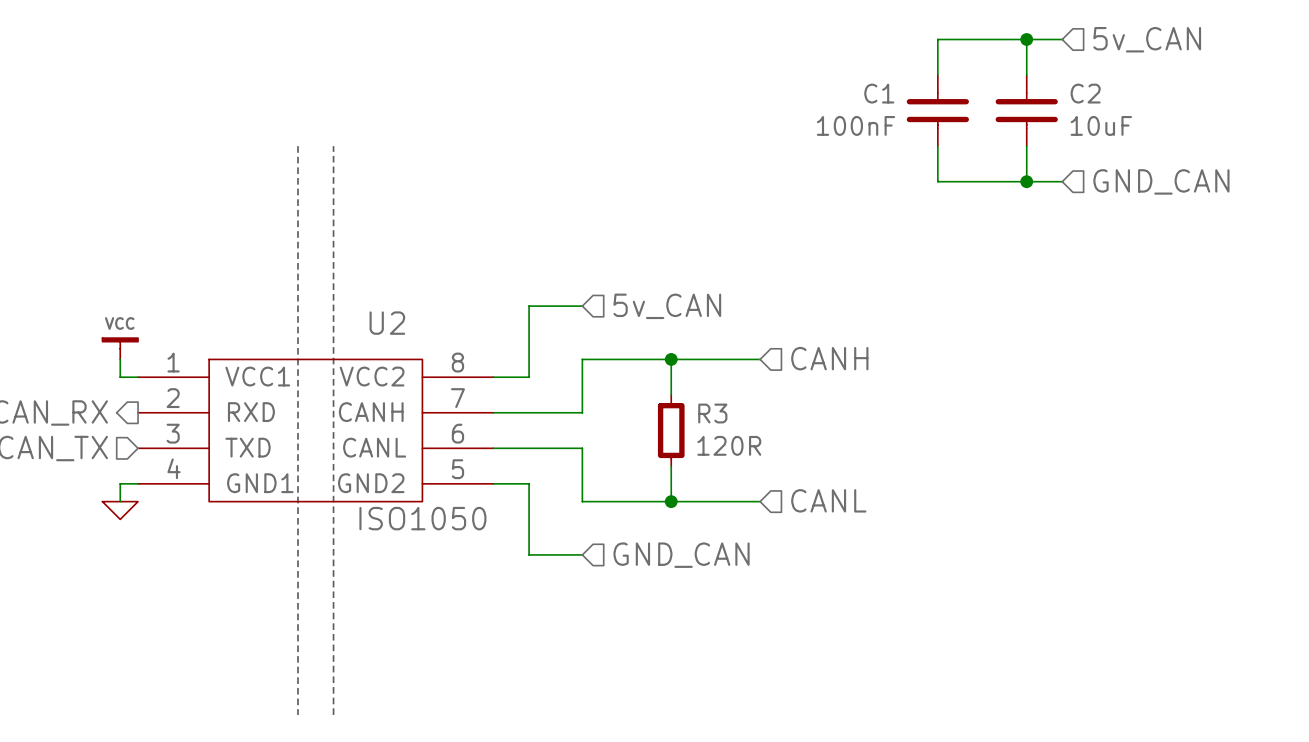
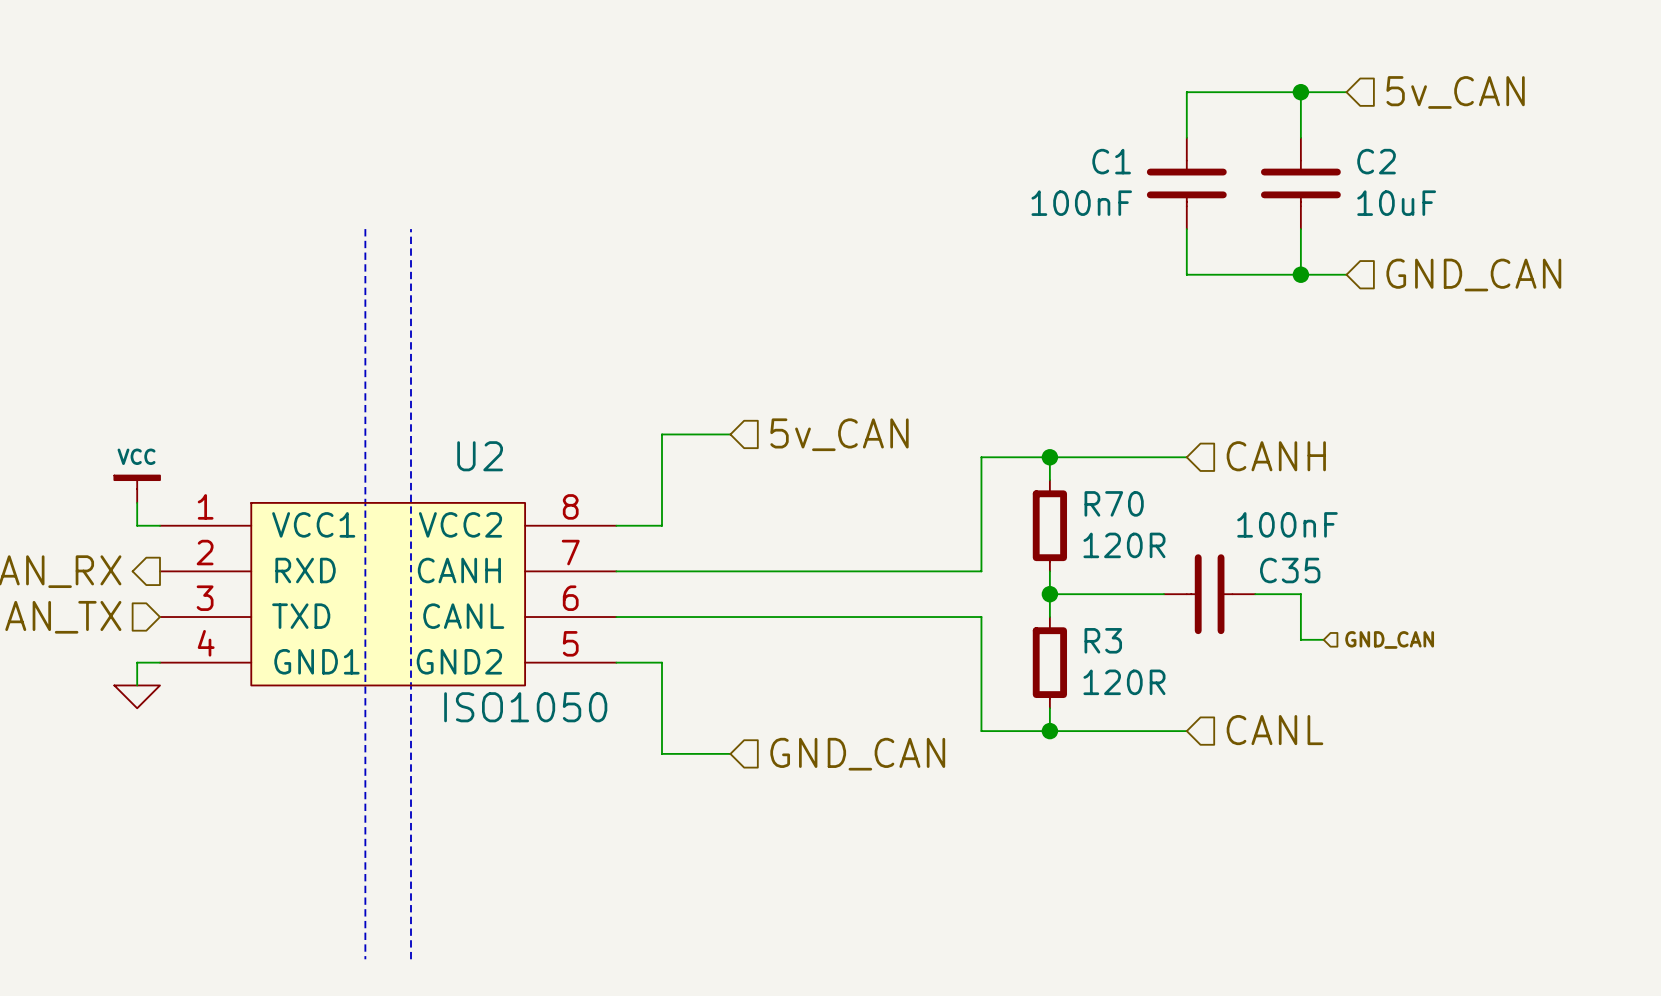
wire: none -> (1049, 457) (1049, 480)
junction: none -> (1049, 457)
hierarchical label position: CANH (829, 358) -> CANH (1276, 456)
wire: (671, 359) (671, 394) -> (1049, 571) (1049, 617)
junction: (671, 359) -> none
wire: (760, 359) (582, 359) (582, 412) -> (1186, 457) (981, 457) (981, 571) (730, 571)
R70: none -> 120R (1049, 525)
R3 position: (671, 430) -> (1049, 662)
wire: none -> (1049, 594) (1163, 594)
junction: none -> (1049, 594)
C35: none -> 100nF (1209, 594)
wire: none -> (1255, 594) (1300, 594) (1300, 639) (1323, 639)
wire: (582, 448) (582, 501) (760, 501) -> (730, 617) (981, 617) (981, 731) (1186, 731)
wire: (671, 466) (671, 501) -> none
hierarchical label: none -> GND_CAN (1389, 639)
hierarchical label position: CANL (828, 500) -> CANL (1274, 730)
junction: (671, 501) -> none
wire: none -> (1049, 708) (1049, 731)
junction: none -> (1049, 731)

